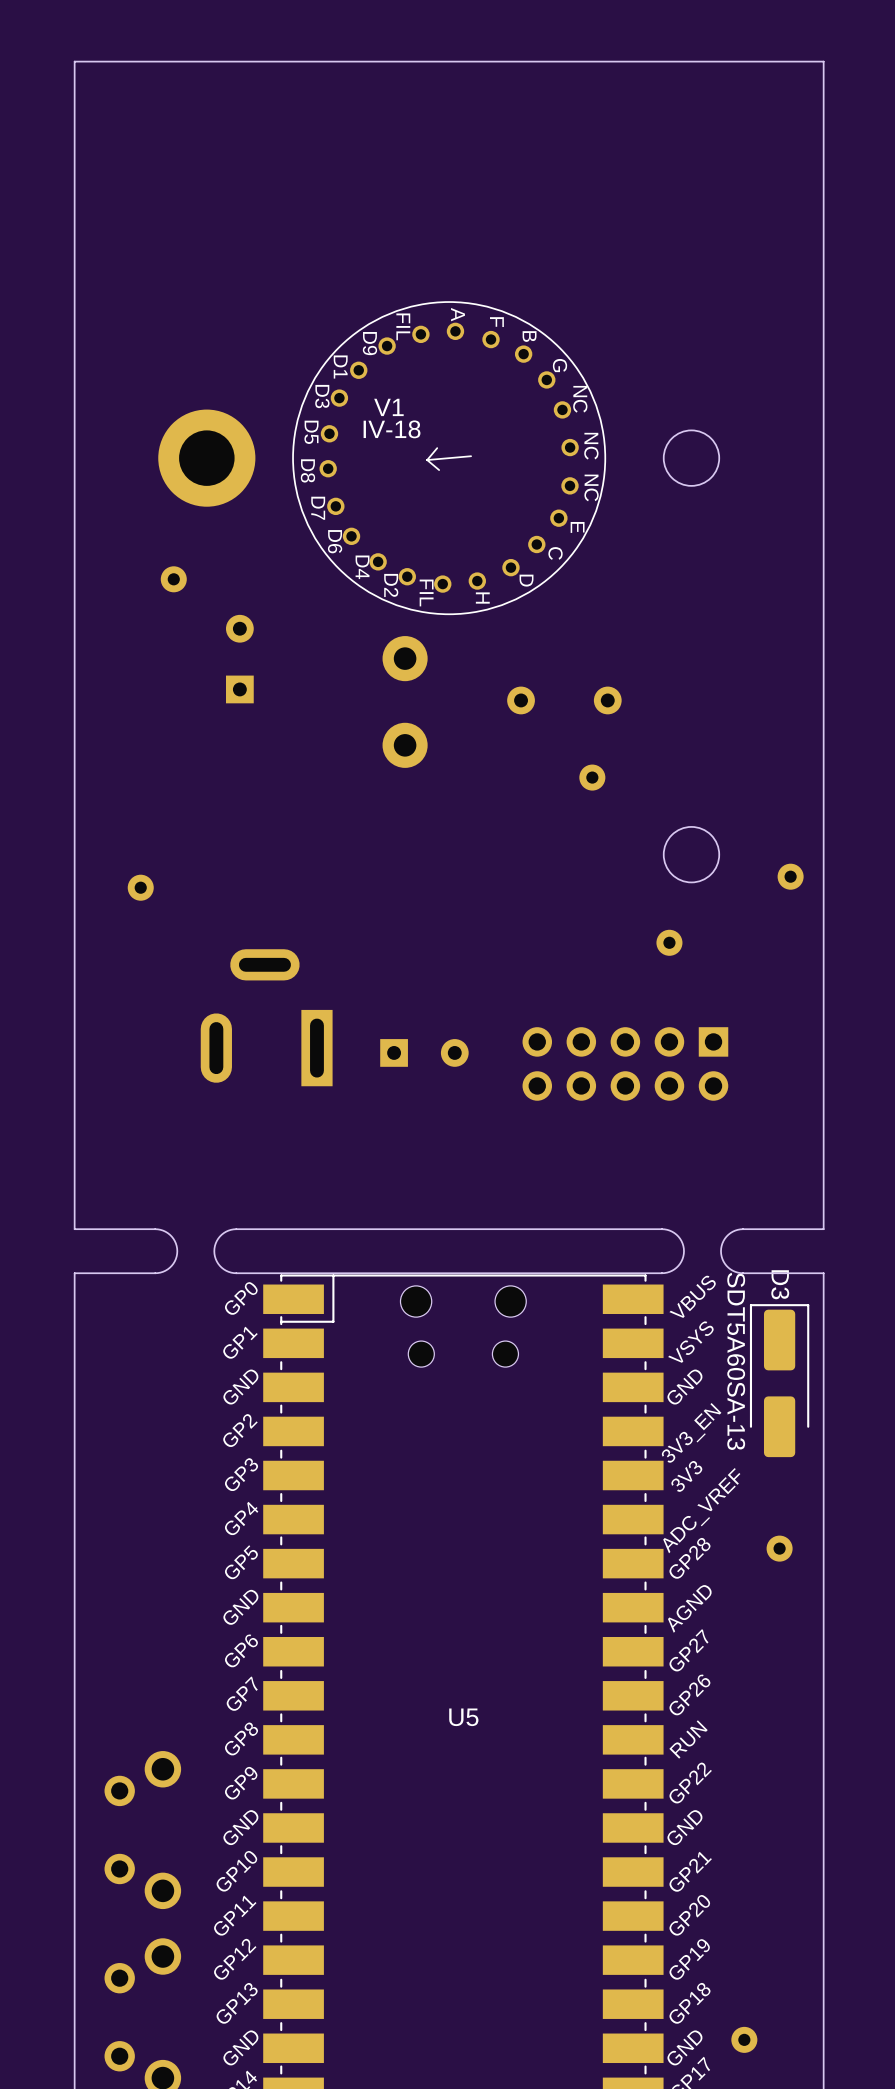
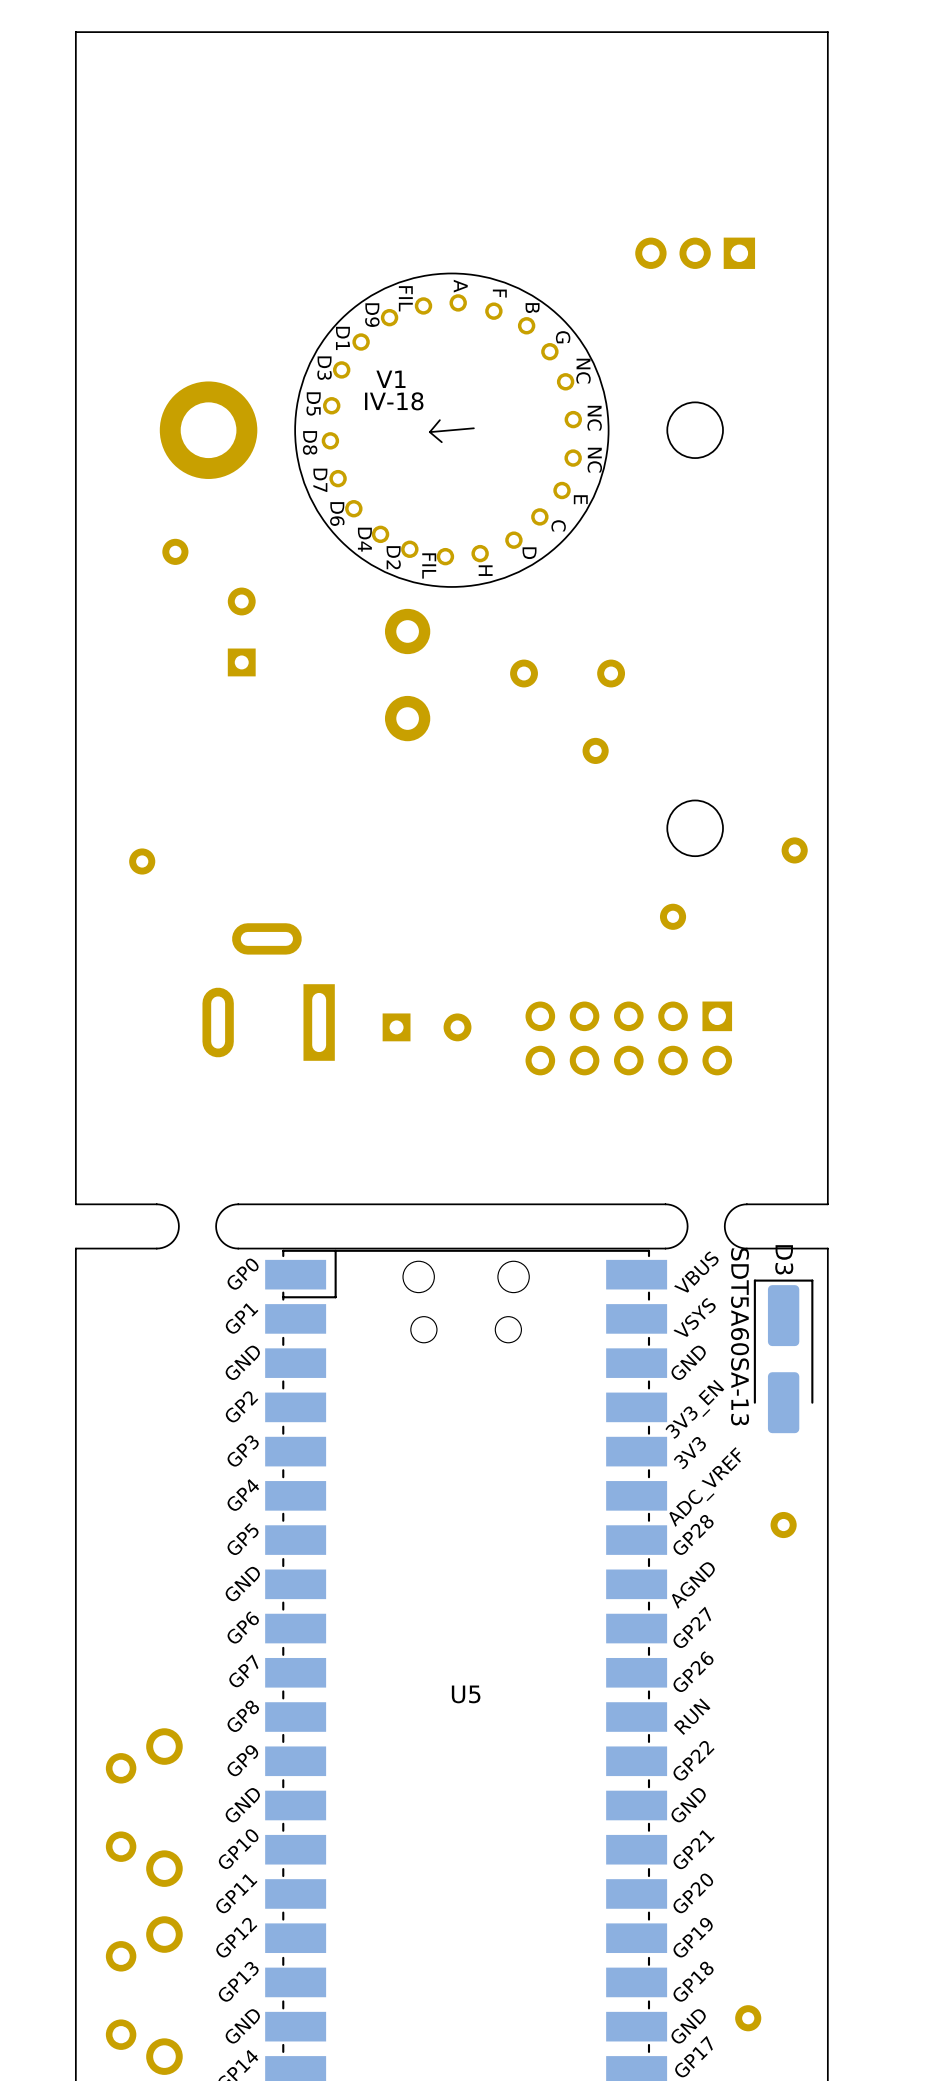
part: none -> (695, 253)

